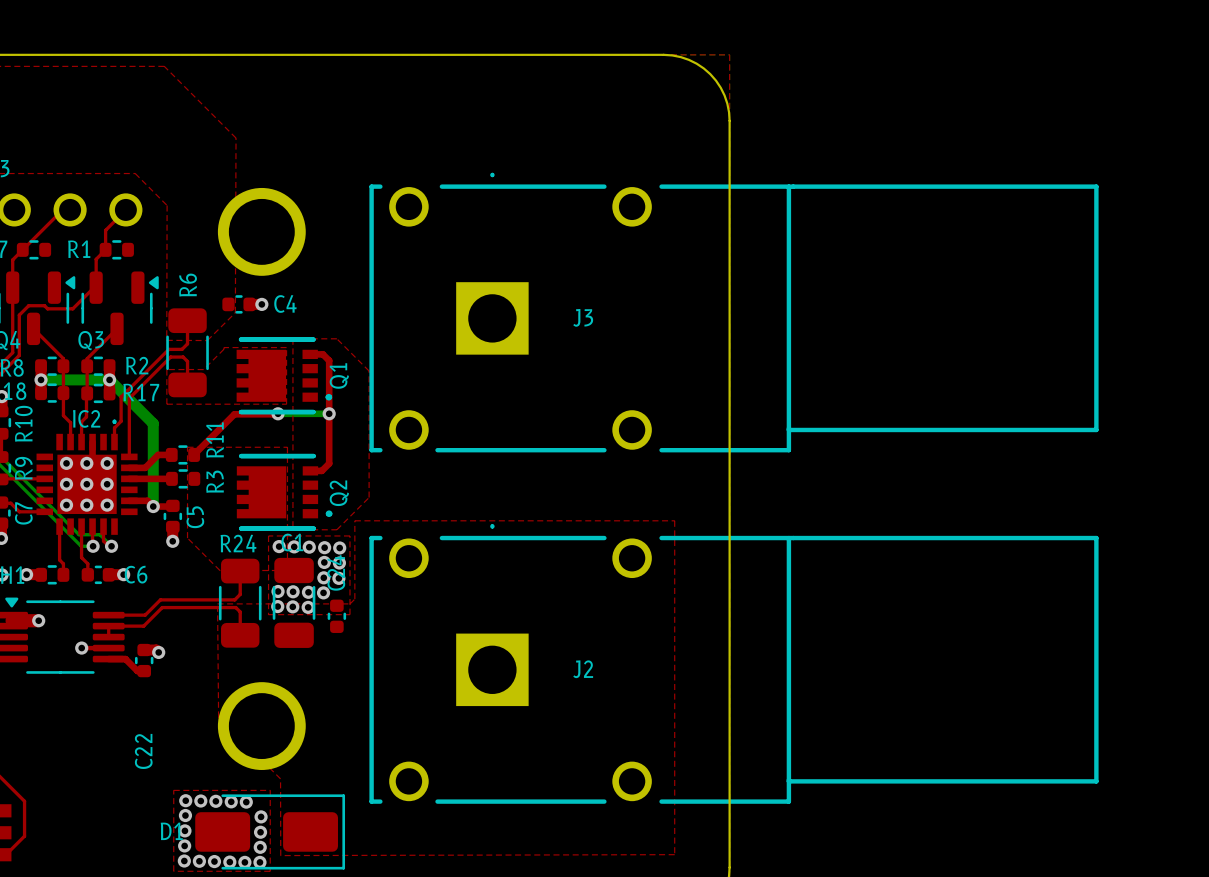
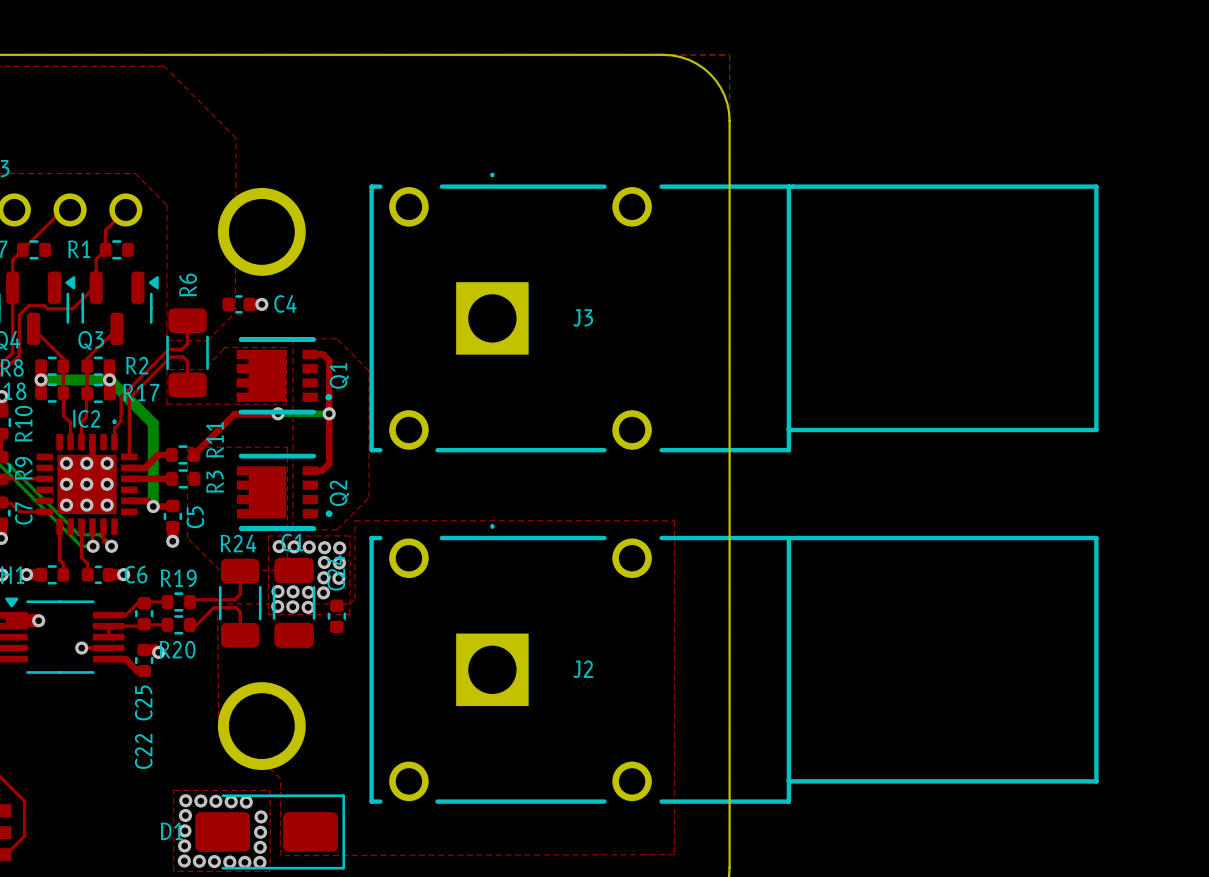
top track: (192, 599) (160, 599) (145, 615) (125, 615) -> (137, 603) (125, 615)
top track: none -> (167, 601) (144, 603)
R19: none -> (178, 601)
top track: (214, 607) (162, 607) (143, 626) -> (214, 607) (196, 624) (189, 624)
C25: none -> (144, 613)
top track: none -> (144, 624) (167, 624)
R20: none -> (178, 624)

